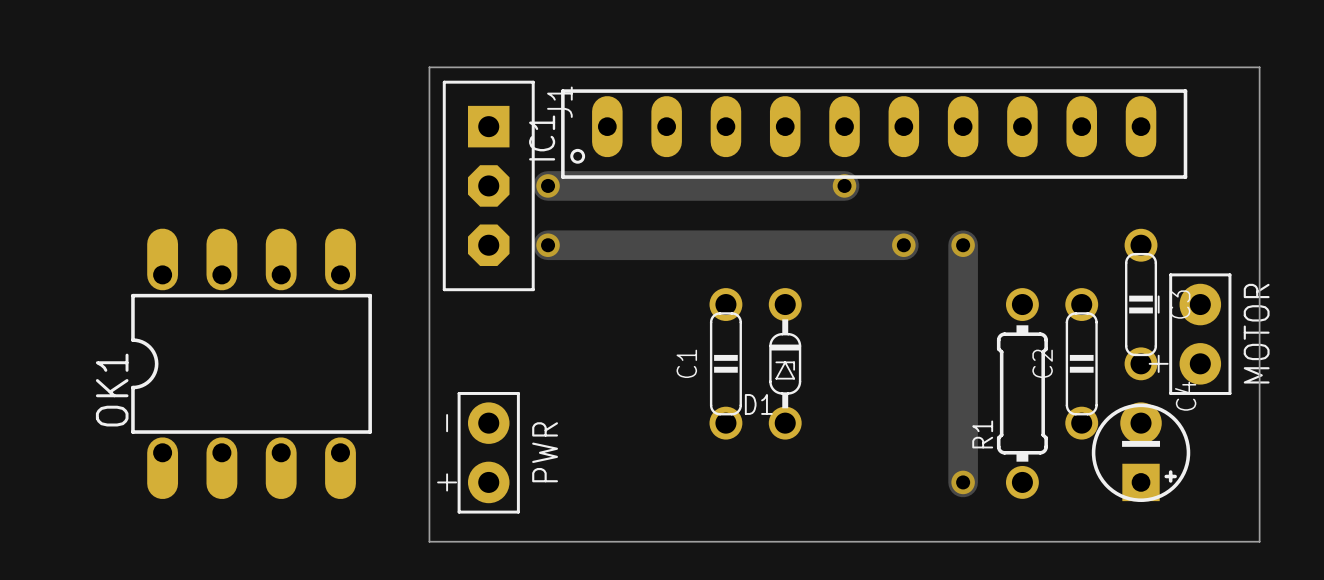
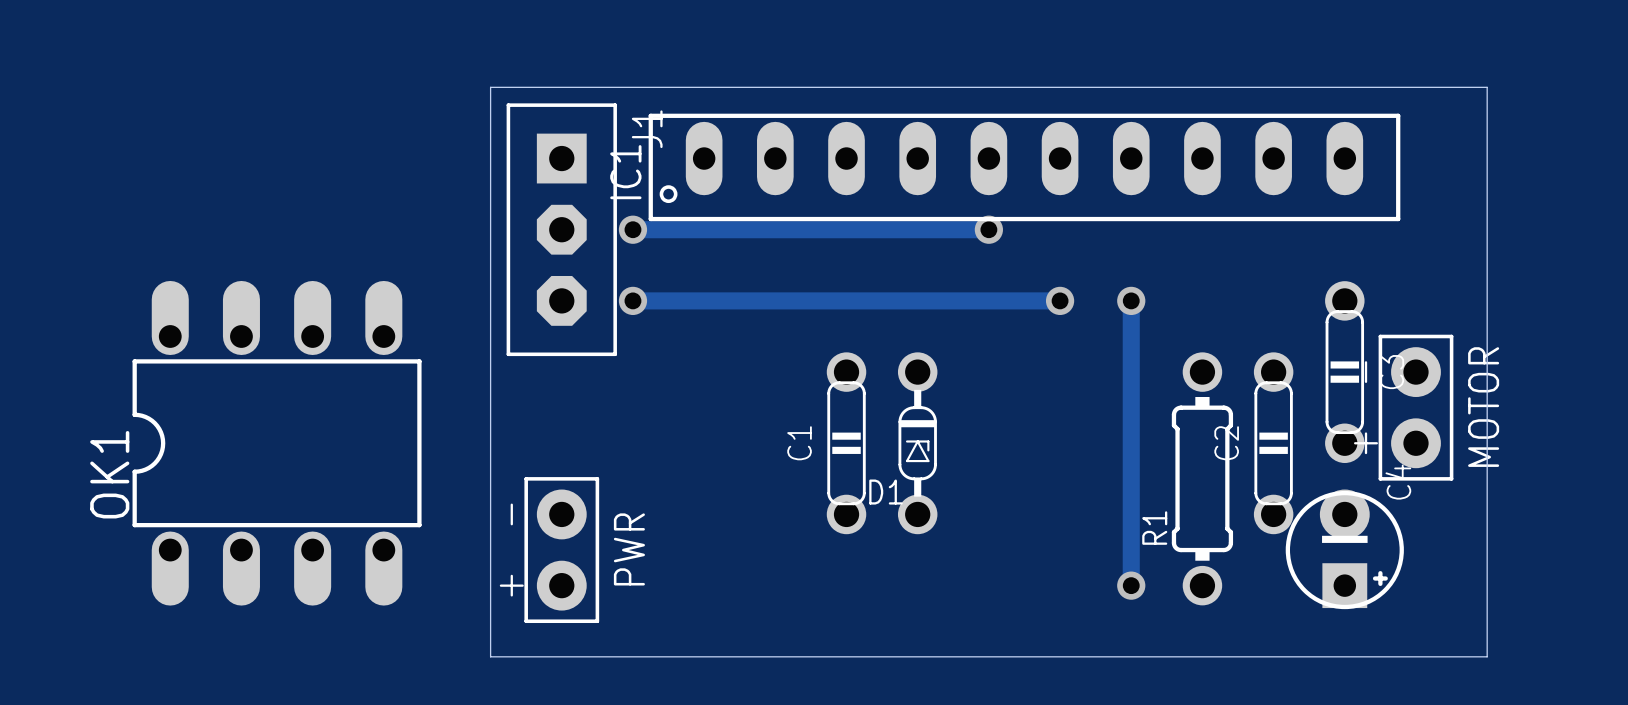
track width: thick (548, 185) (844, 185) -> thin (632, 229) (988, 229)
track width: thick (548, 245) (903, 245) -> thin (632, 300) (1060, 300)
track width: thick (963, 245) (963, 482) -> thin (1131, 300) (1131, 585)

